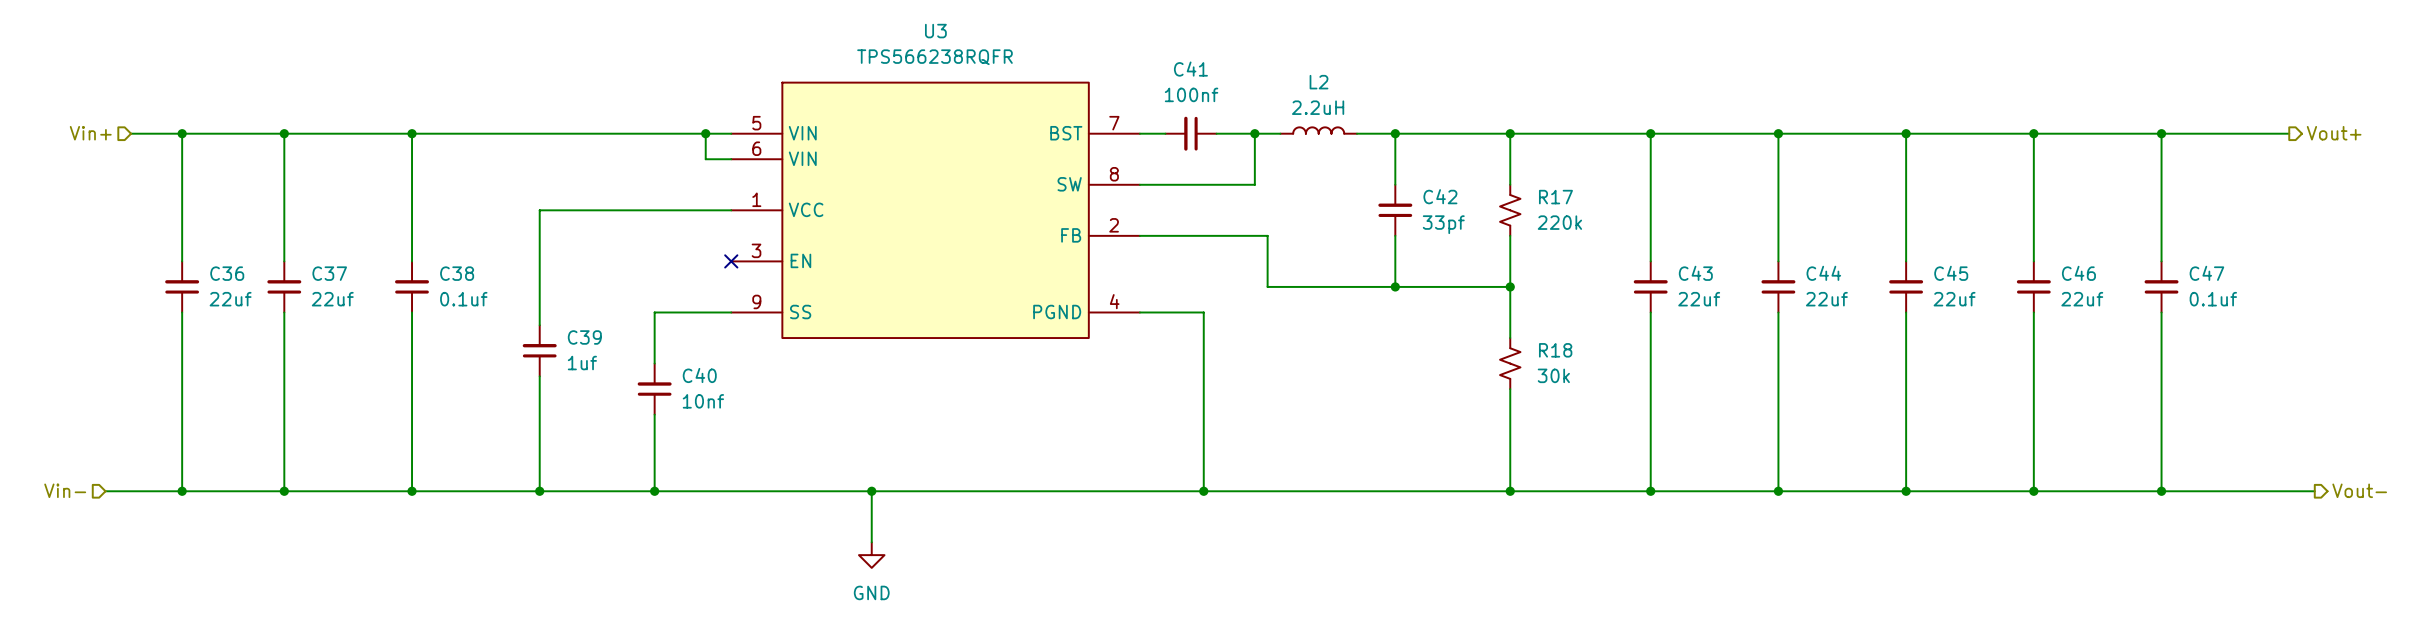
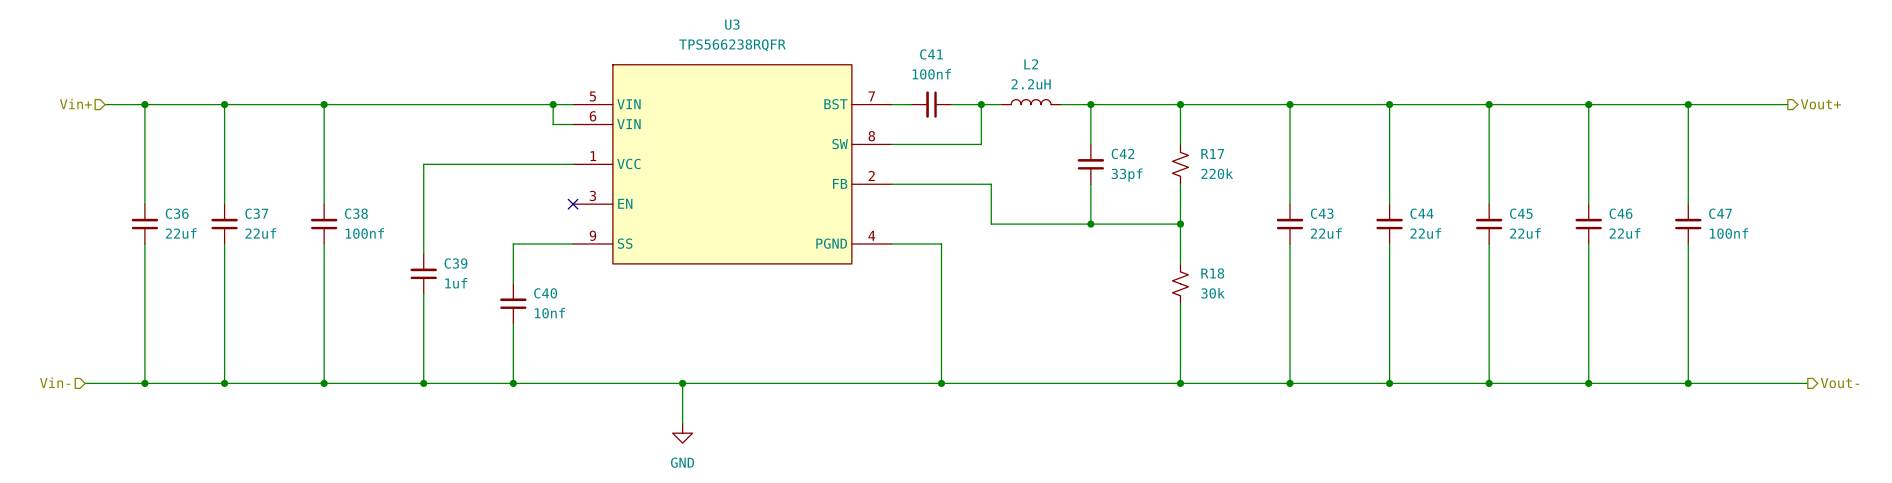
C38 value: 0.1uf (463, 299) -> 100nf (364, 233)
C47 value: 0.1uf (2213, 299) -> 100nf (1729, 233)

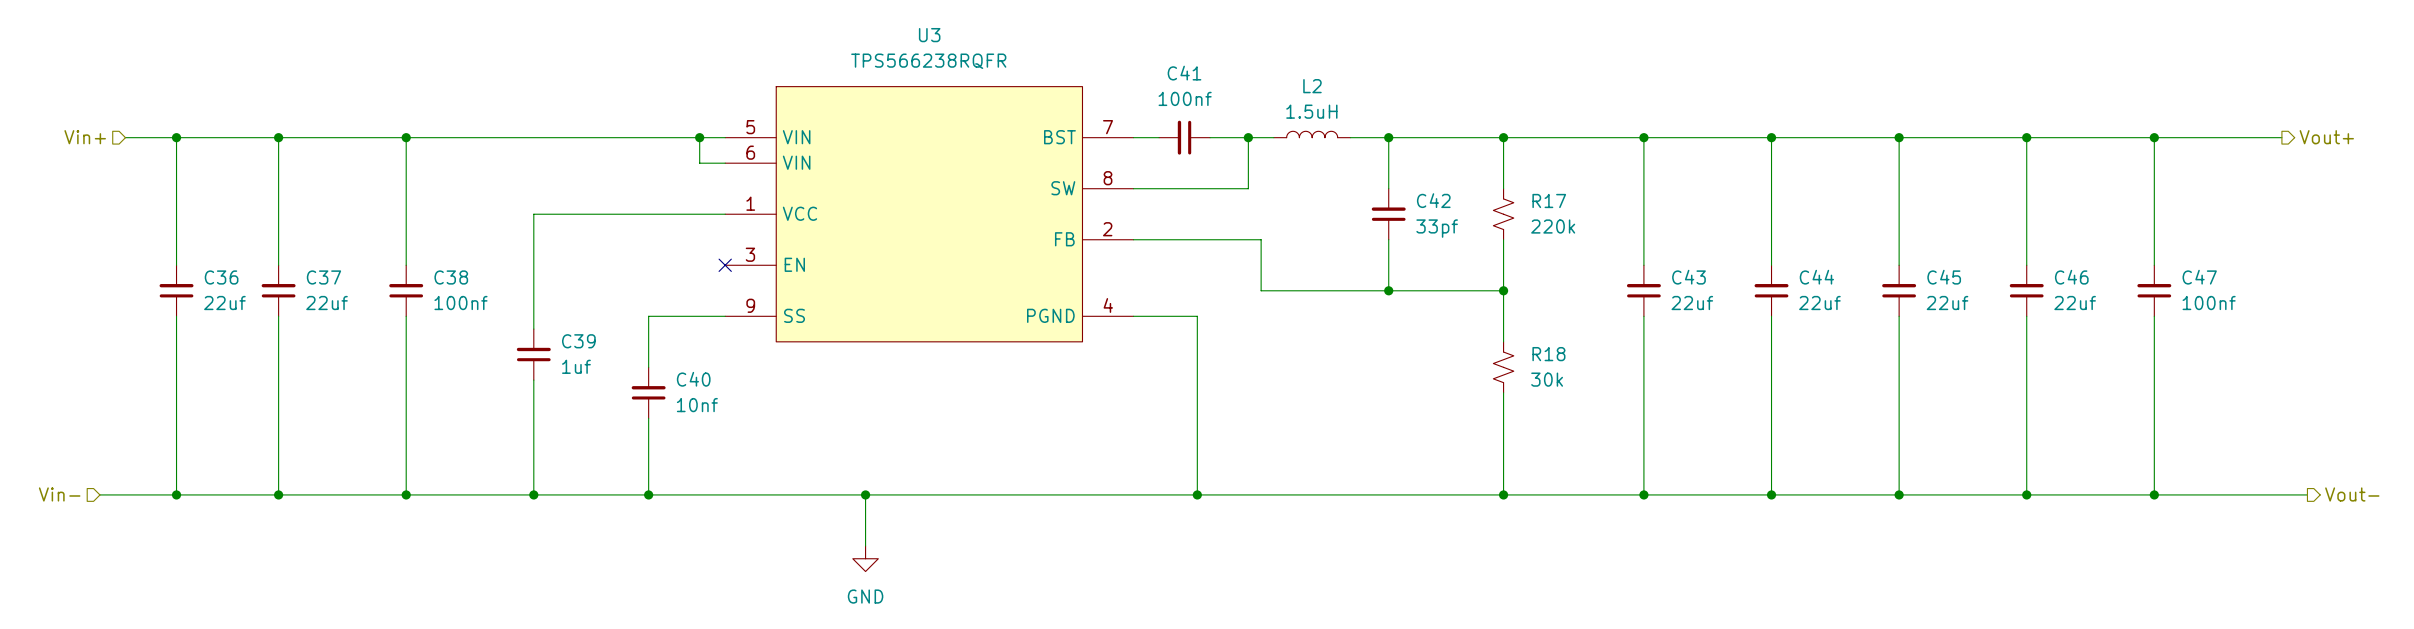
L2 value: 2.2uH (1031, 84) -> 1.5uH (1311, 111)

